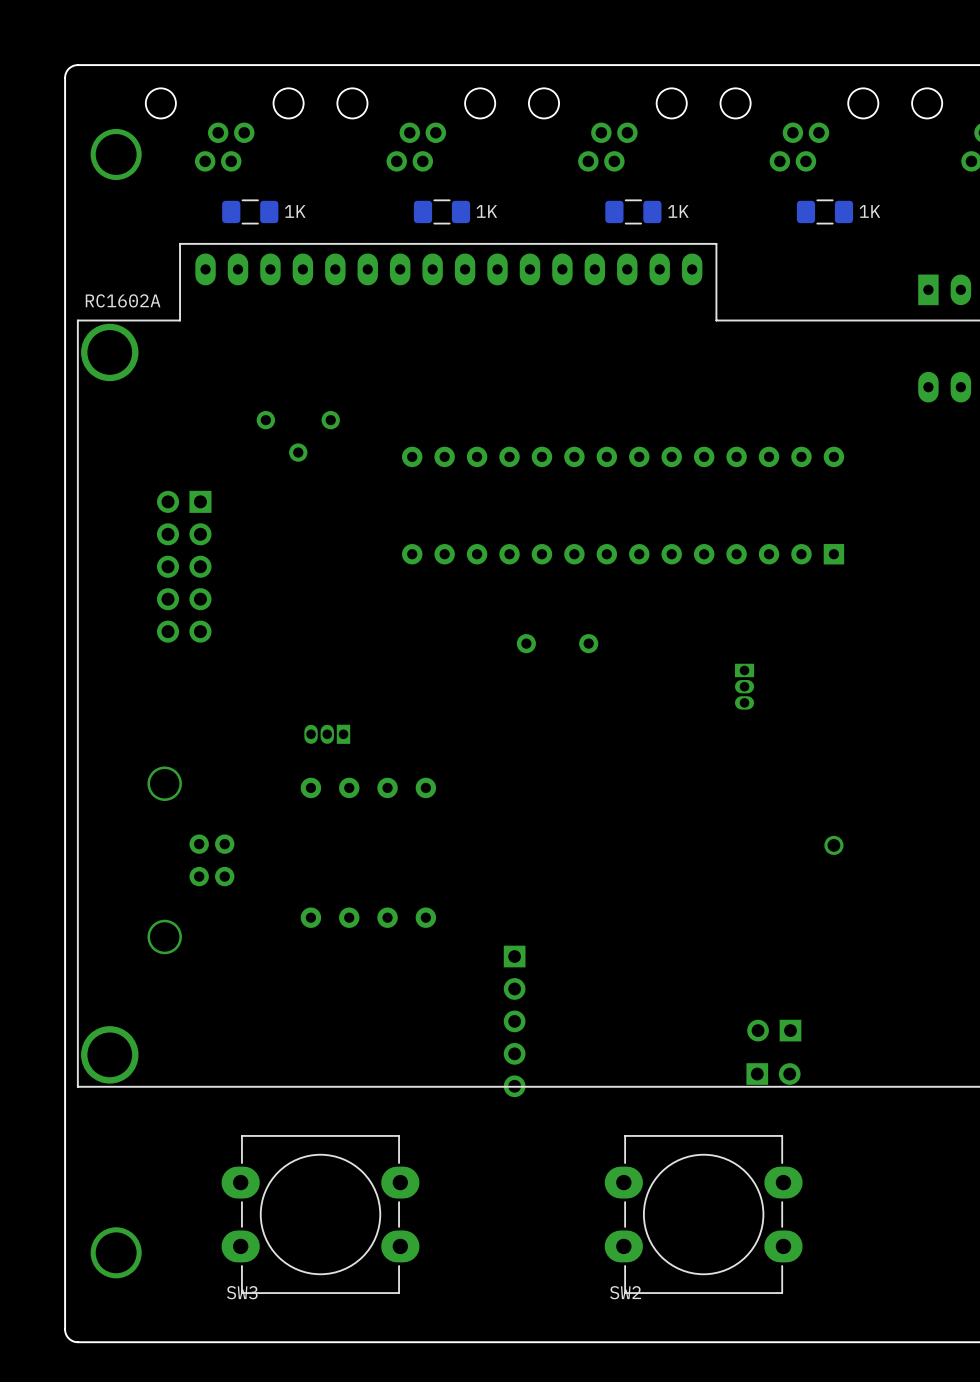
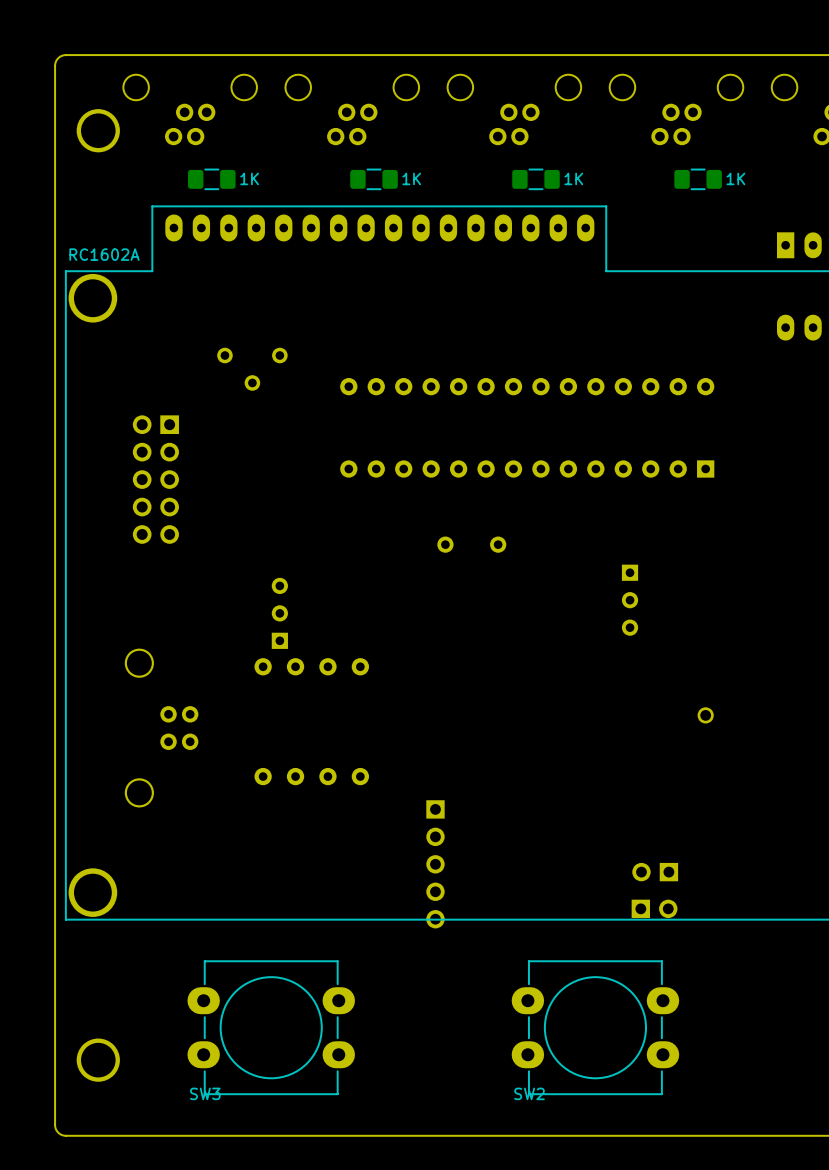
part: (744, 686) -> none
part: none -> (630, 600)
part footprint: [304, 724, 351, 744] -> [271, 577, 288, 649]

